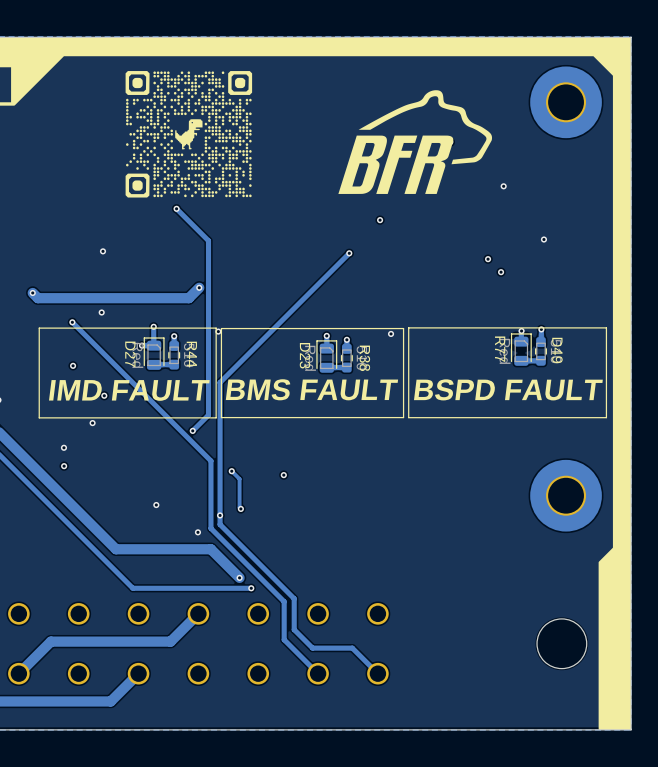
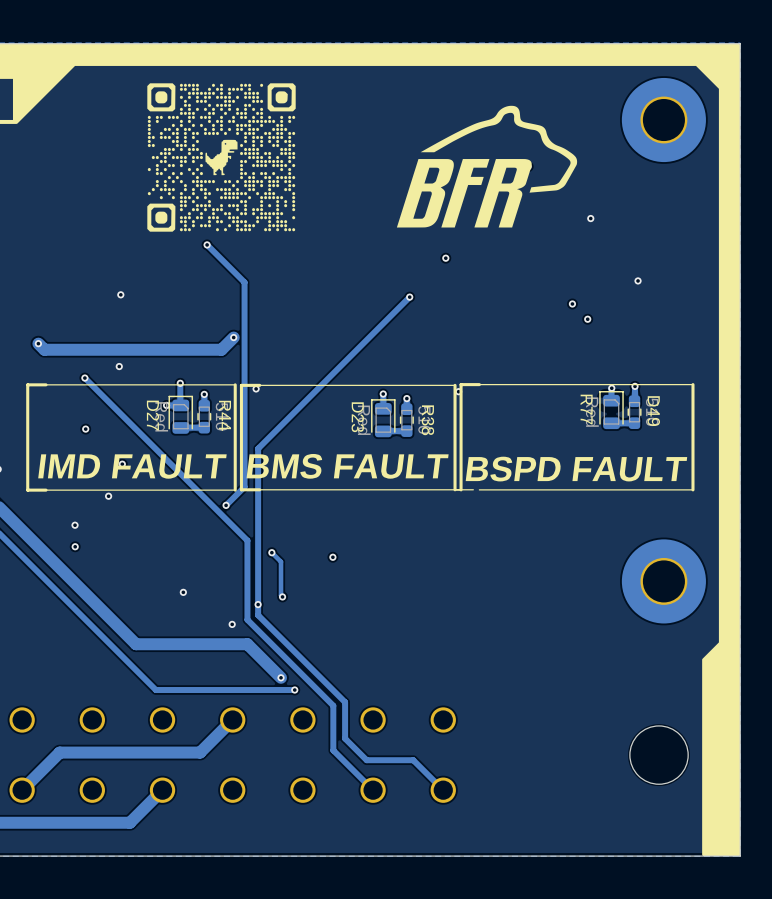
line: (408, 327) (408, 417) -> none
line: (590, 327) (606, 327) (606, 417) (590, 417) -> (692, 384) (692, 489)
line: (39, 328) (39, 417) -> (46, 384) (27, 384) (27, 490) (46, 490)
line: (200, 328) (216, 328) (216, 417) (200, 417) -> (235, 384) (235, 490)
line: (221, 328) (221, 417) -> (259, 385) (241, 385) (241, 489) (259, 489)
line: (387, 328) (403, 328) (403, 417) -> (455, 385) (455, 489) (461, 489) (461, 384) (479, 384)
text position: BMS FAULT (311, 389) -> BMS FAULT (347, 466)
text position: BSPD FAULT (508, 389) -> BSPD FAULT (576, 469)
text position: IMD FAULT (129, 390) -> IMD FAULT (132, 466)

